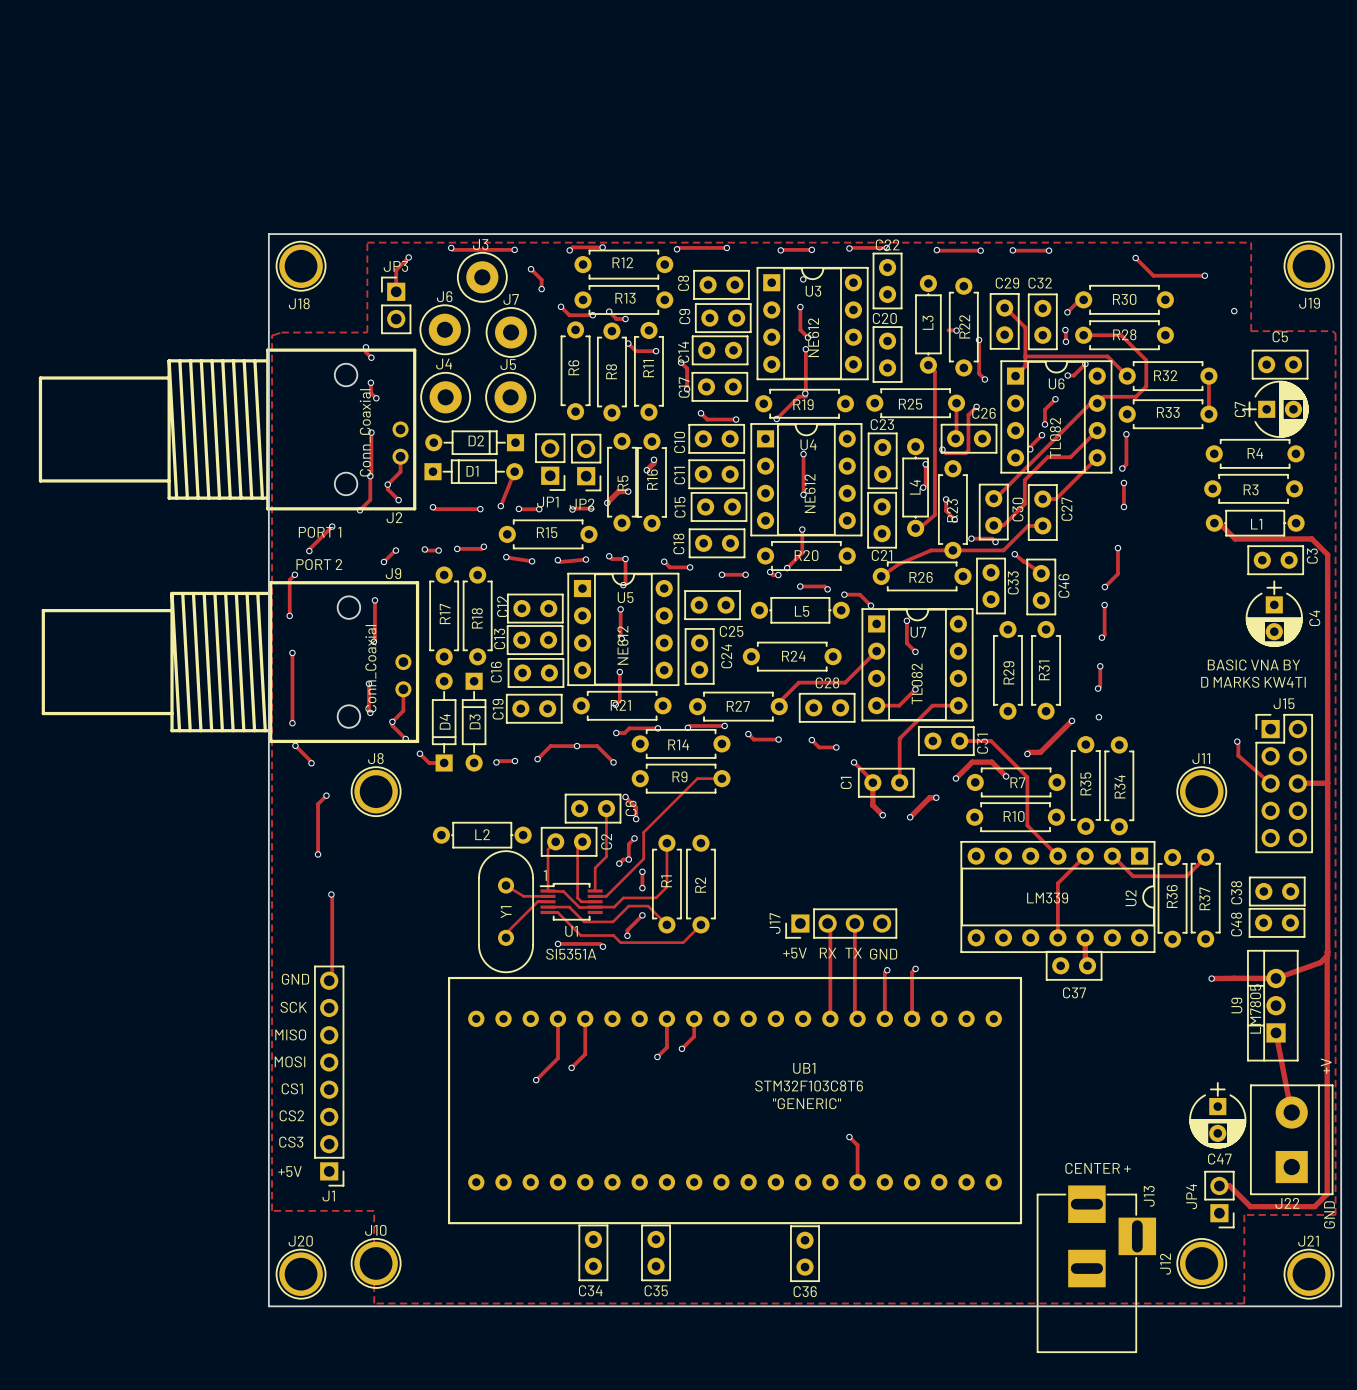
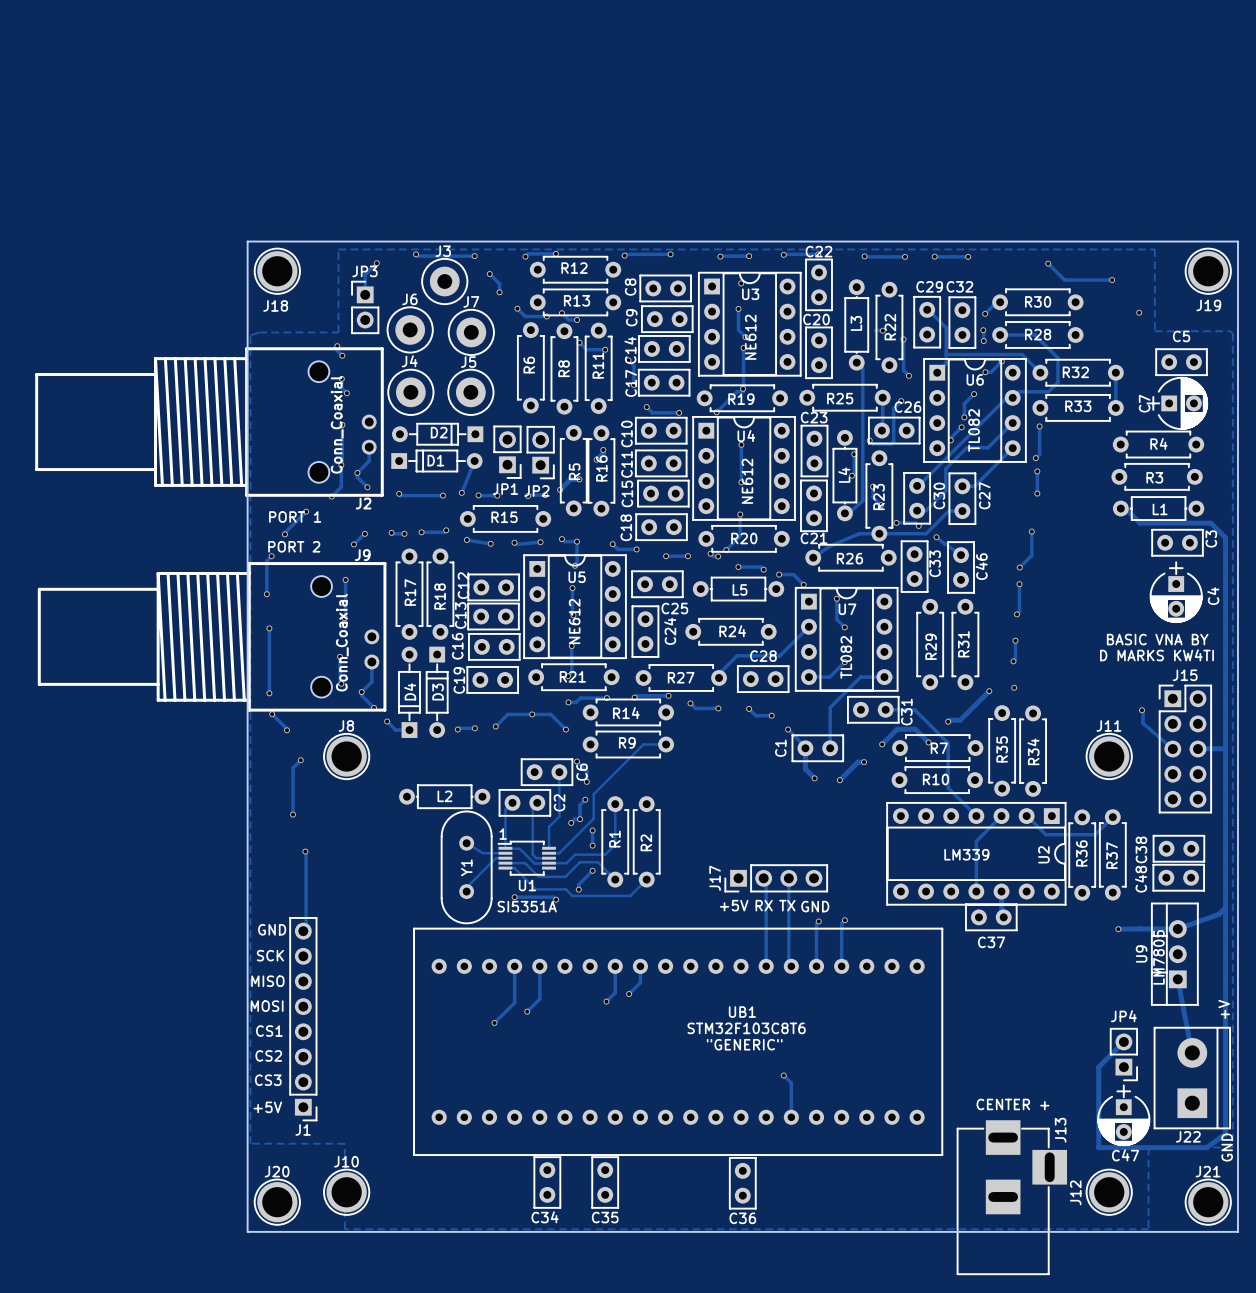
track: (1327, 952) (1327, 1194) (1314, 1206) (1250, 1206) (1229, 1185) (1219, 1185) -> none
track: none -> (1225, 907) (1225, 1134) (1206, 1147) (1098, 1147) (1098, 1067) (1123, 1041)
C47 position: (1217, 1115) -> (1123, 1115)
JP4 name rotation: 0° (1191, 1196) -> 90° clockwise (1123, 1016)
JP4 name position: JP4 (1191, 1196) -> JP4 (1123, 1016)
JP4 position: (1219, 1199) -> (1123, 1054)

